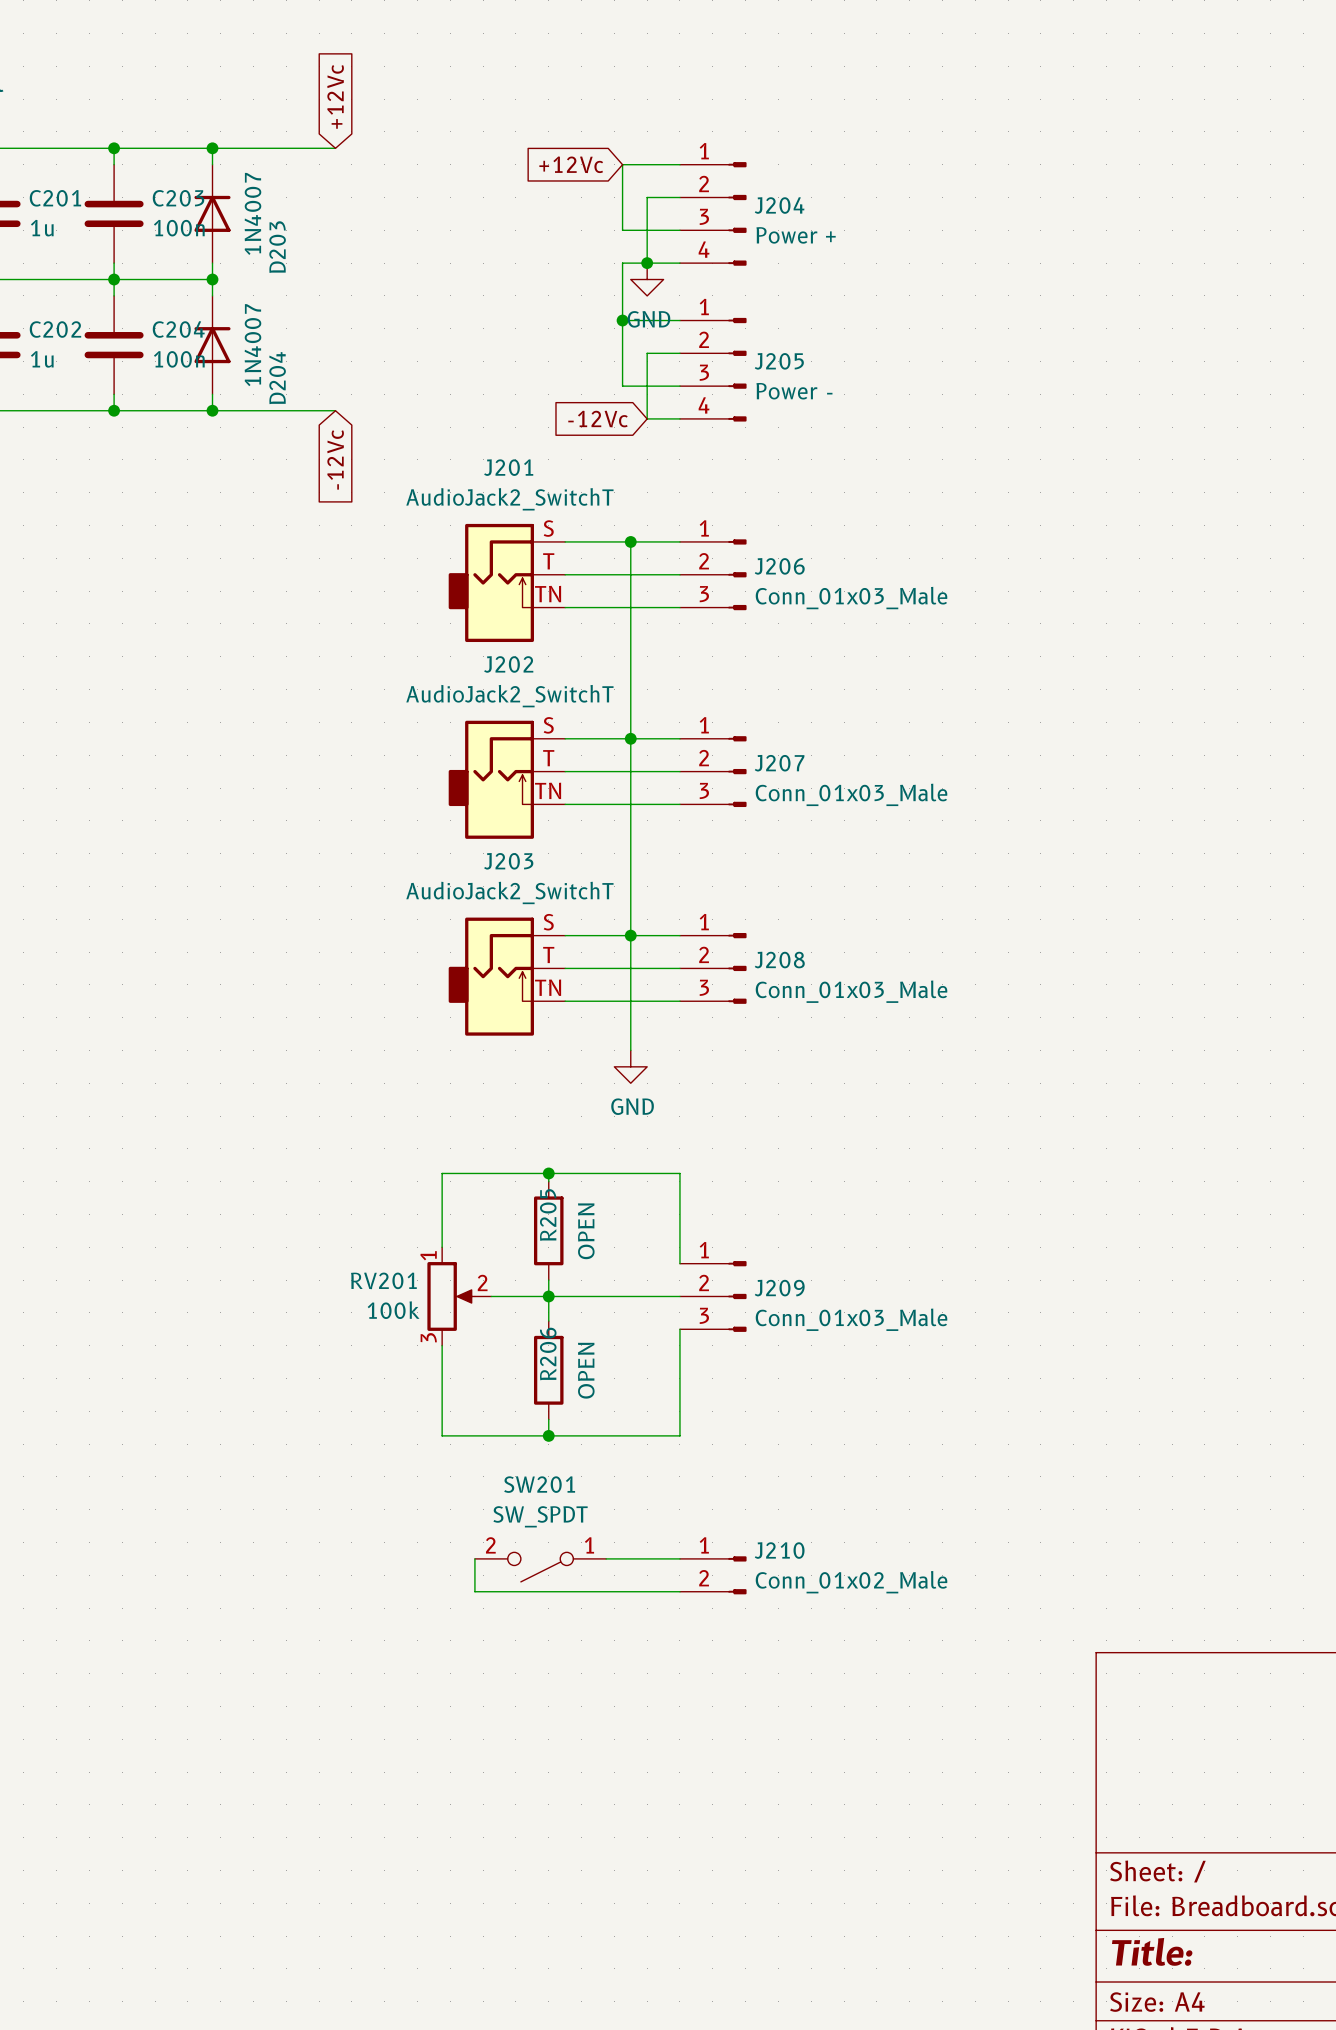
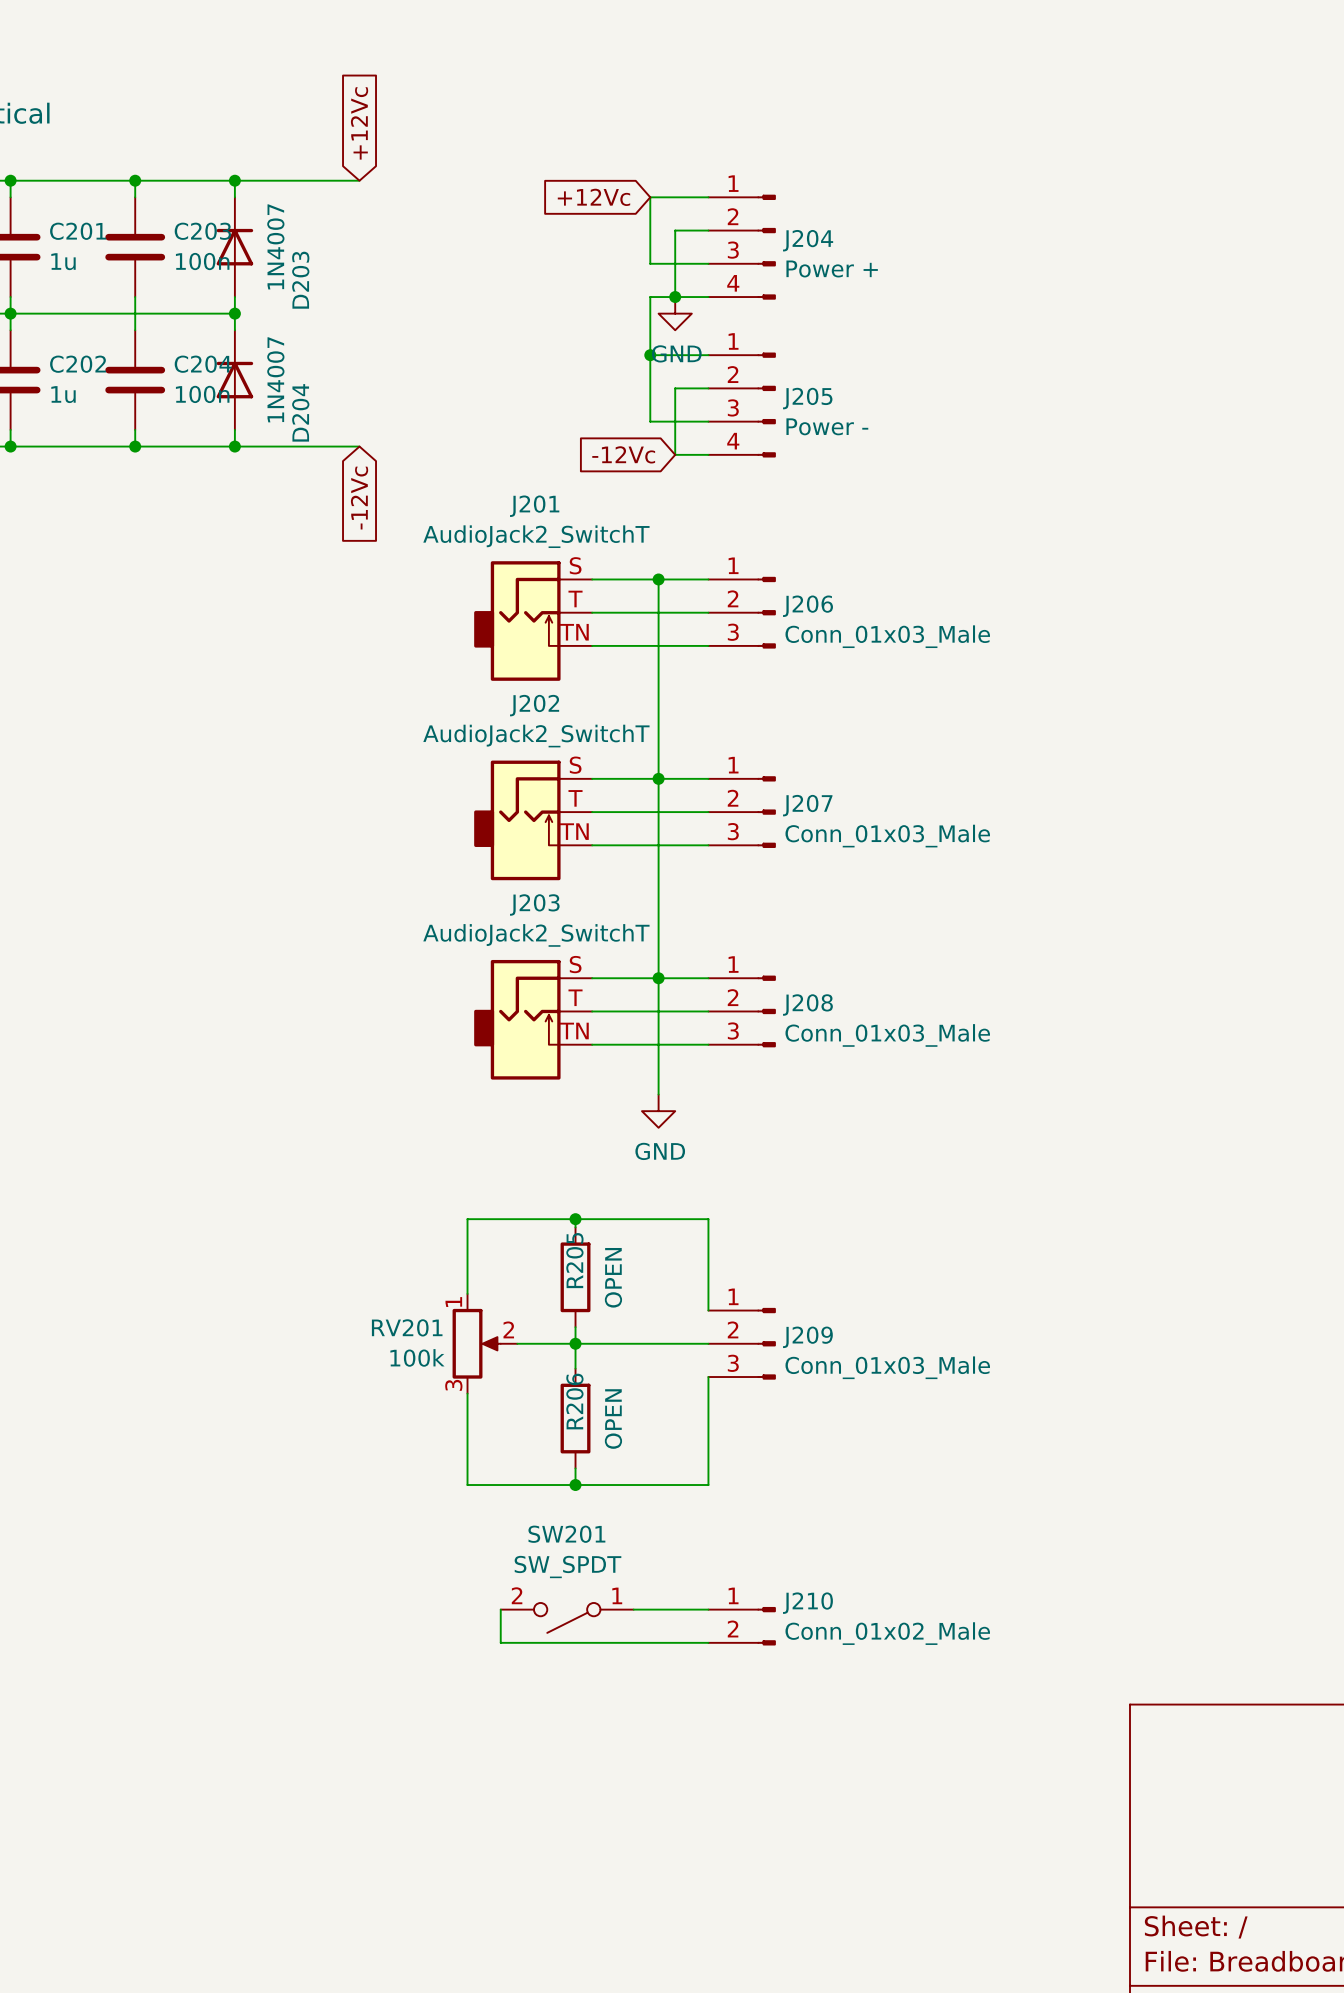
junction: (114, 279) -> none

